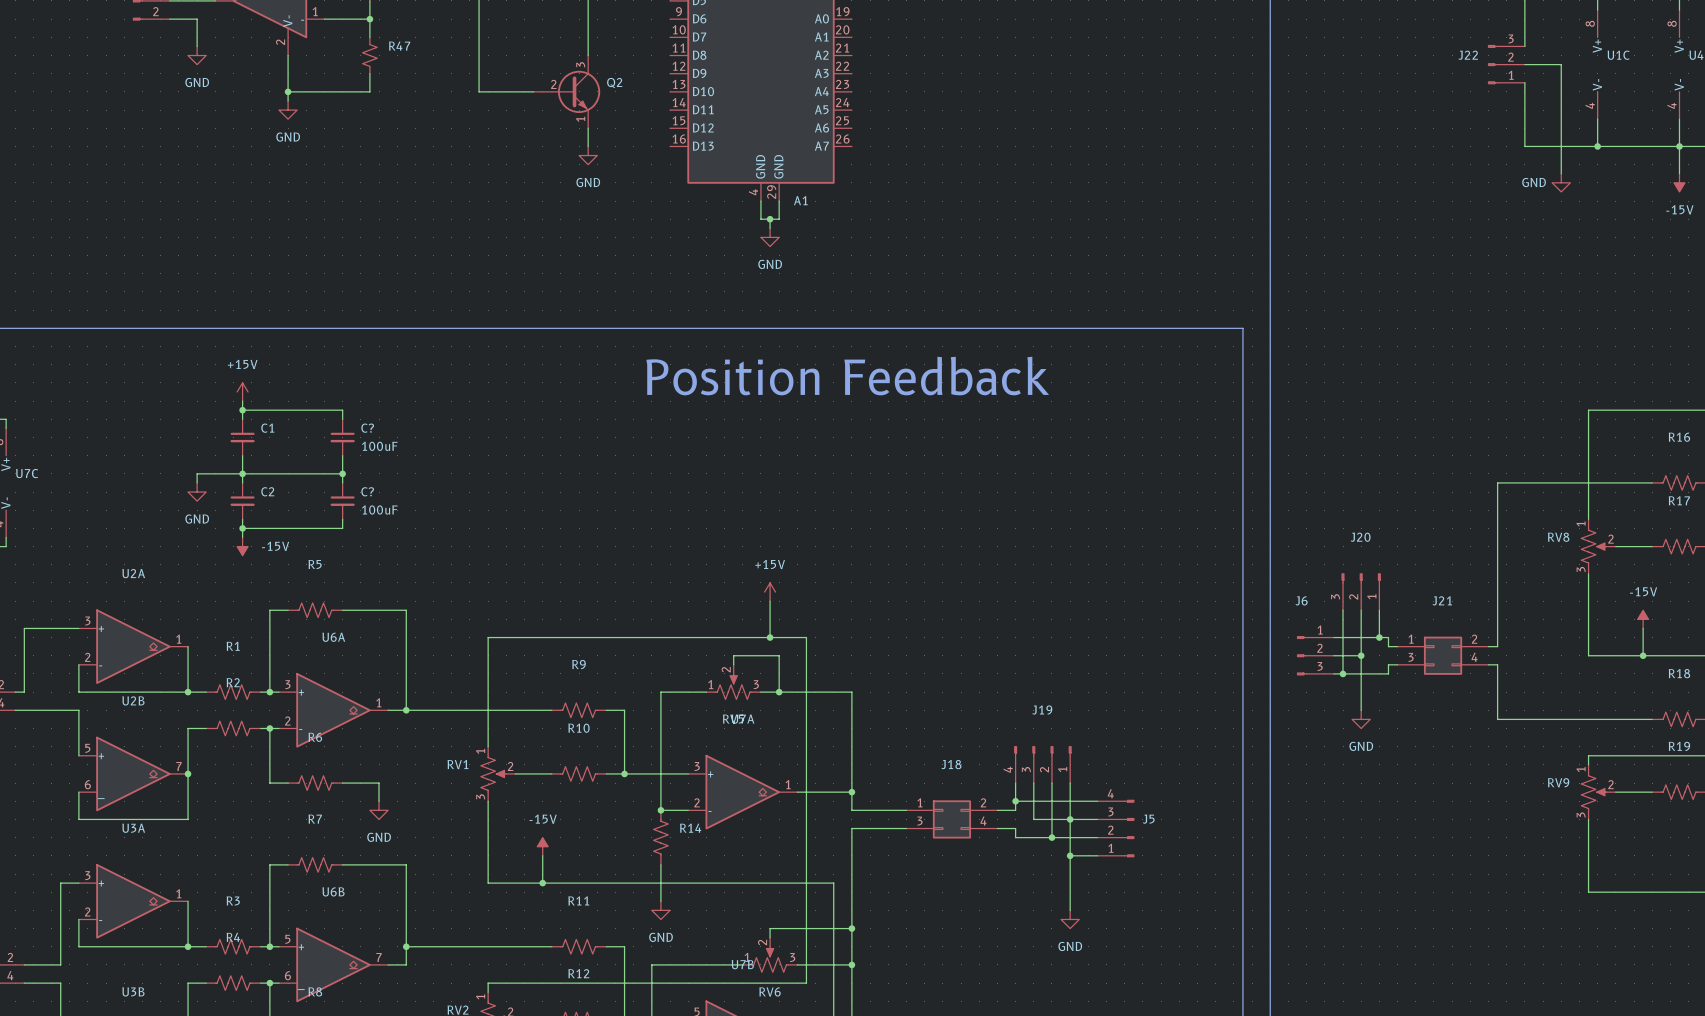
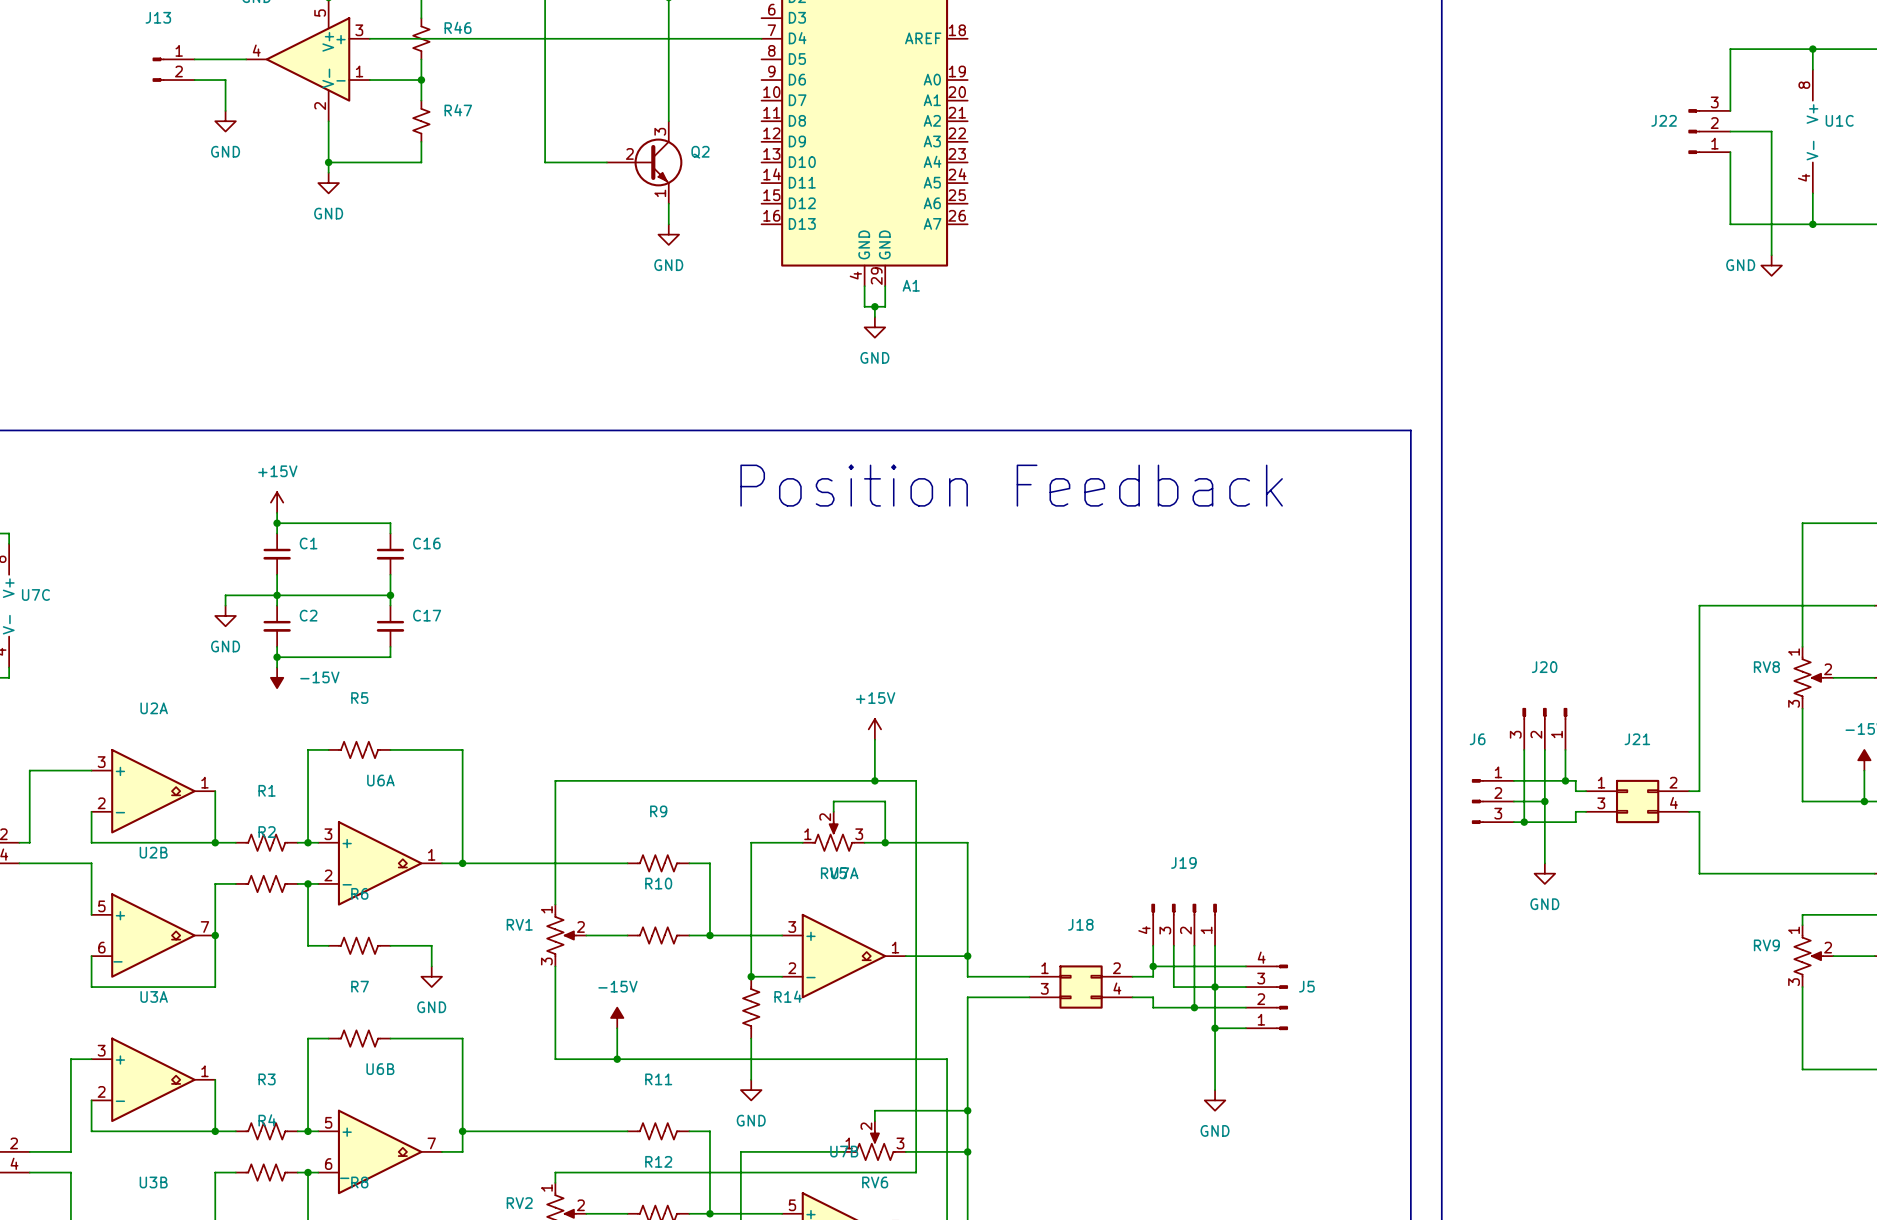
C? name: C? (367, 428) -> C16 (426, 543)
C? value: 100uF (379, 446) -> none
C? name: C? (367, 491) -> C17 (427, 615)
C? value: 100uF (379, 509) -> none

